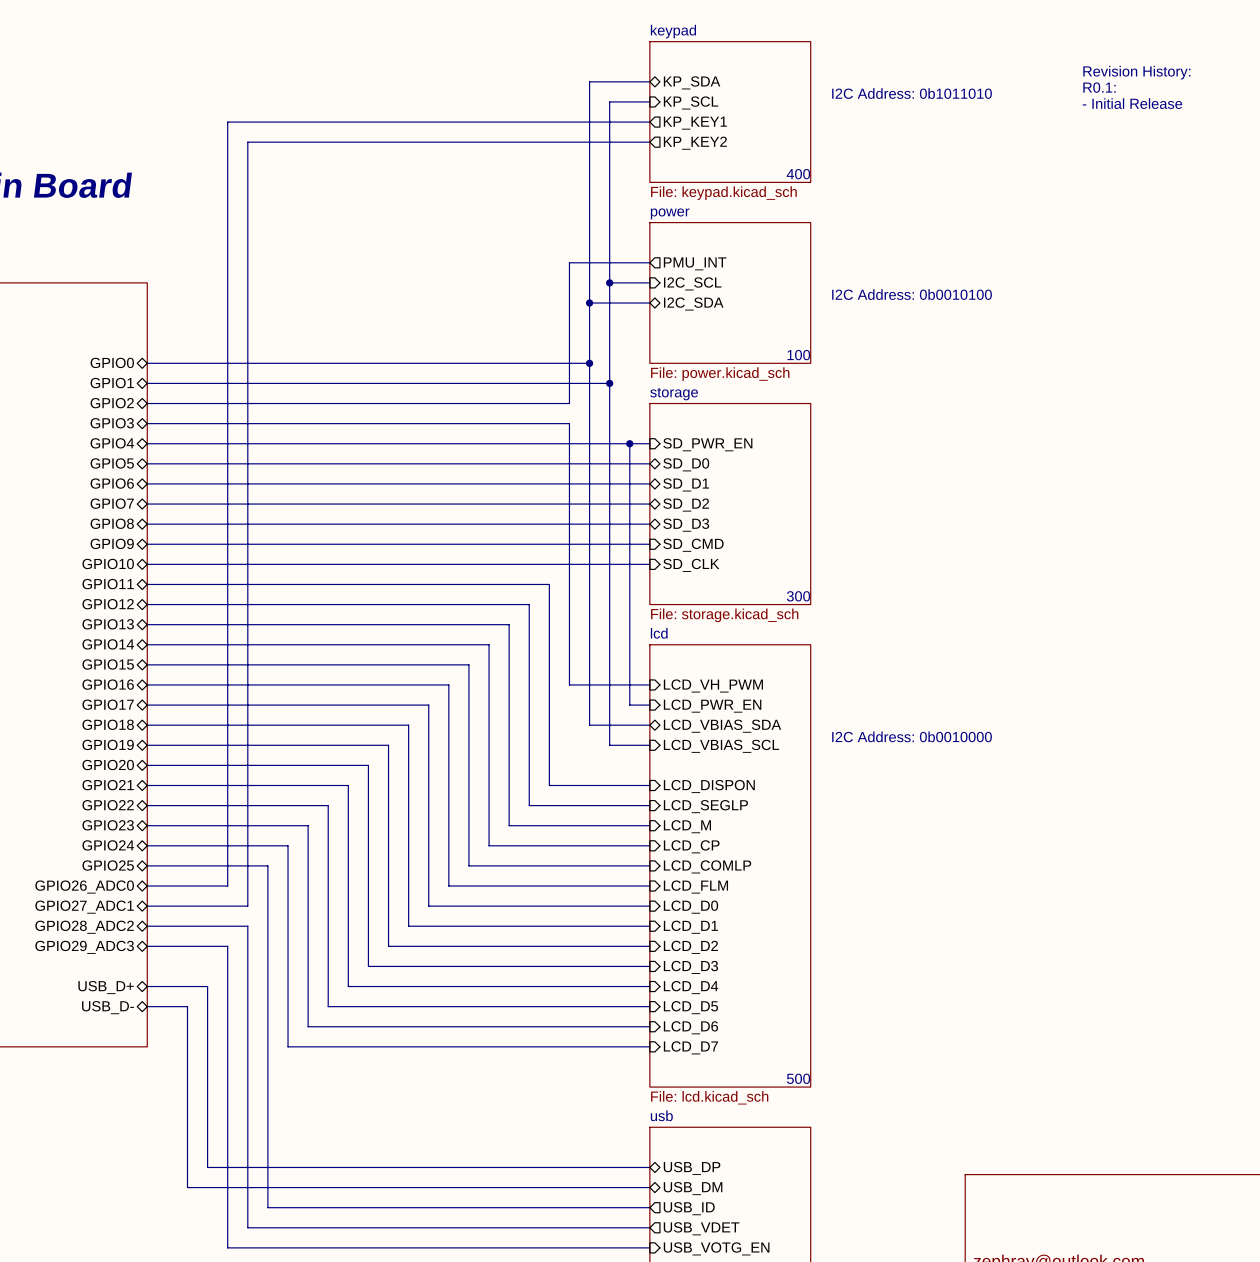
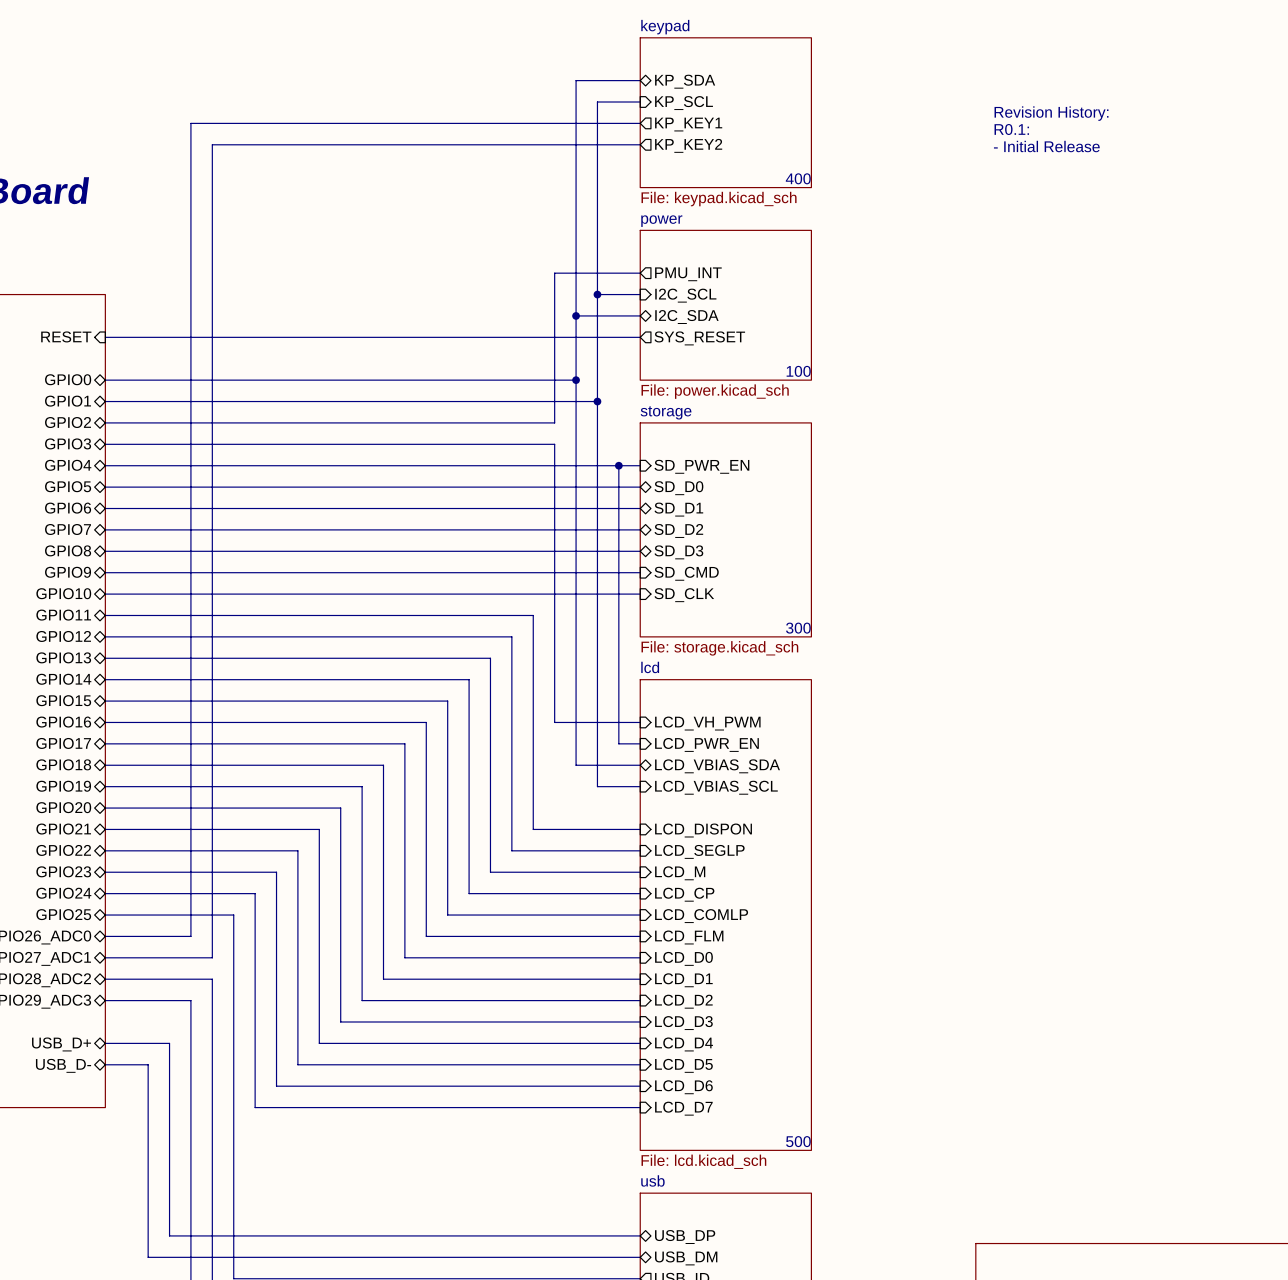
text position: Revision History: (1136, 72) -> Revision History: (1051, 113)
text position: R0.1: (1099, 87) -> R0.1: (1011, 129)
text: I2C Address: 0b1011010 (912, 93) -> none
text position: - Initial Release (1132, 103) -> - Initial Release (1046, 146)
text: I2C Address: 0b0010100 (912, 294) -> none
sheet pin: none -> RESET (66, 336)
wire: none -> (105, 337) (640, 337)
sheet pin: none -> SYS_RESET (699, 338)
text: I2C Address: 0b0010000 (912, 736) -> none

